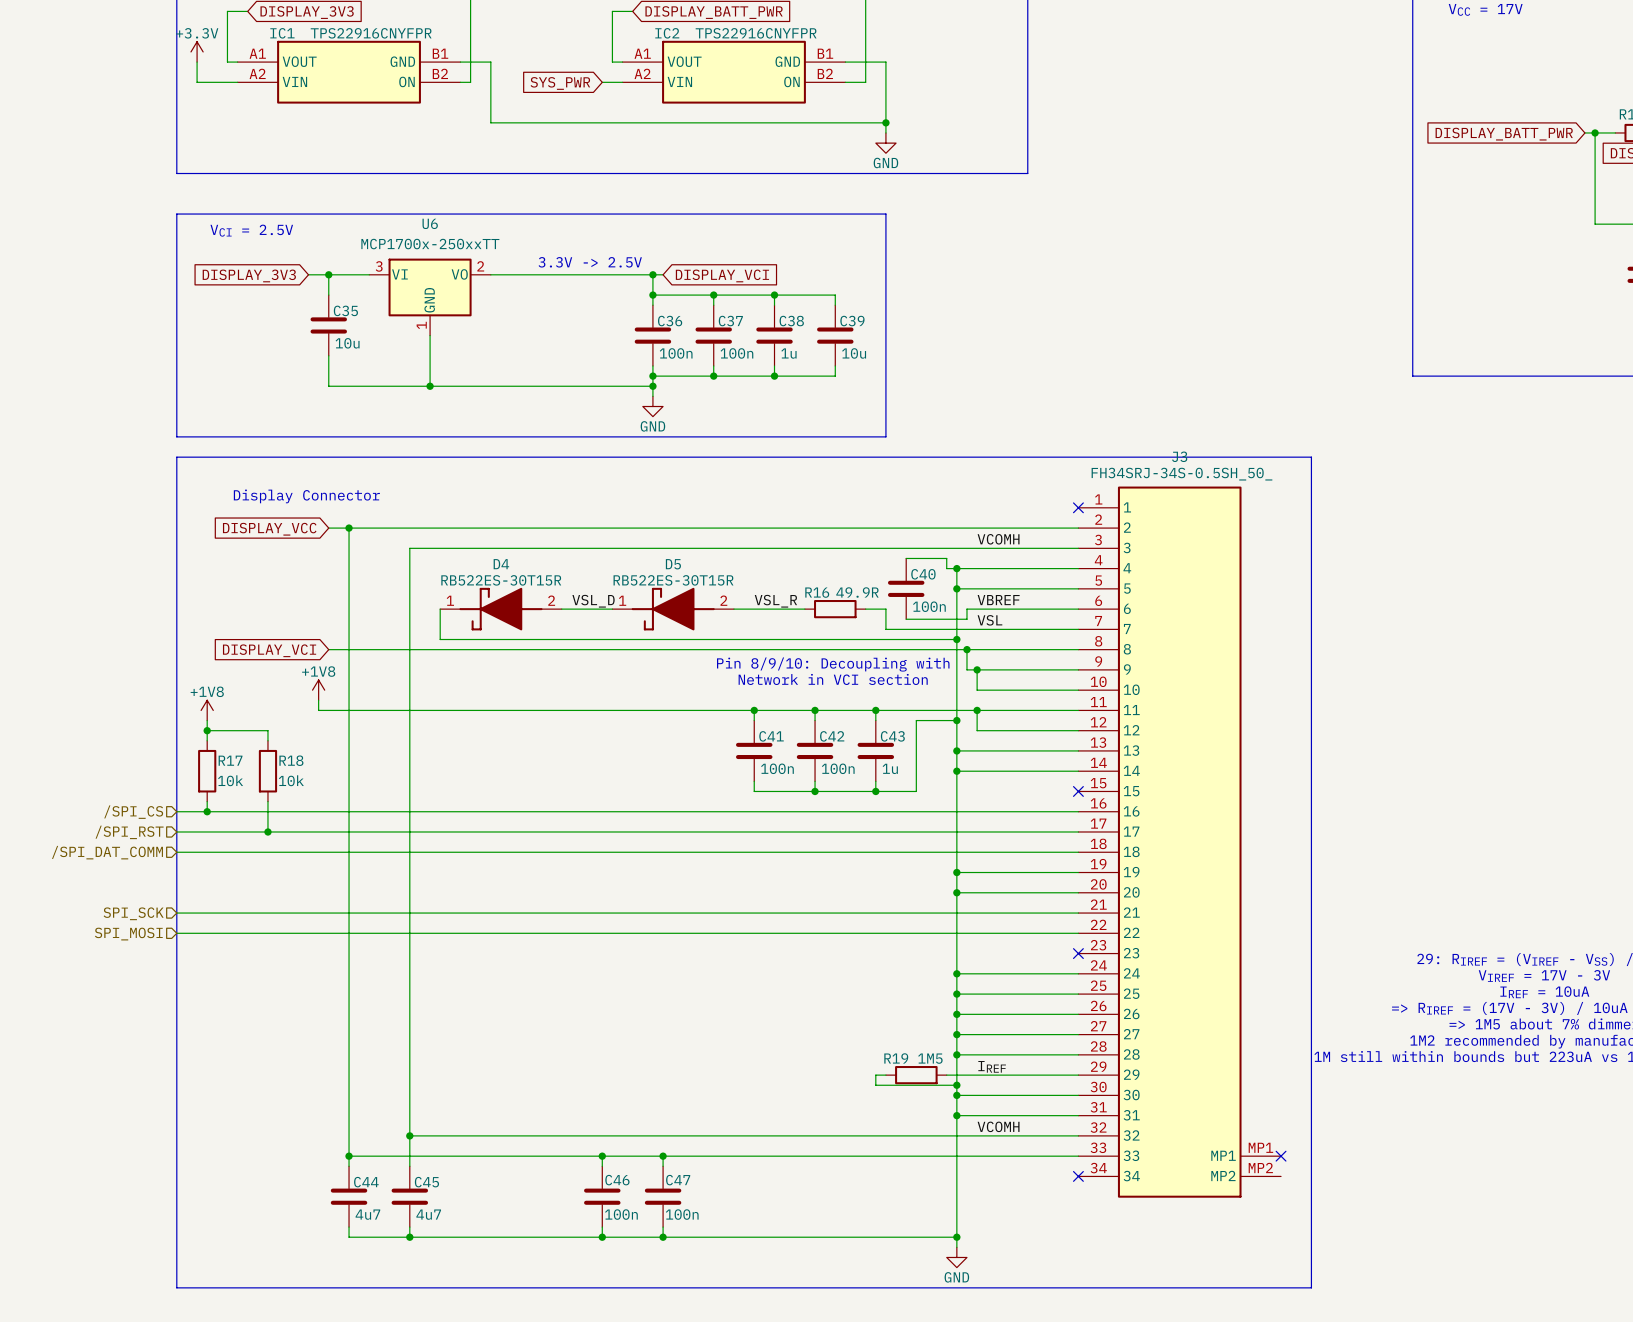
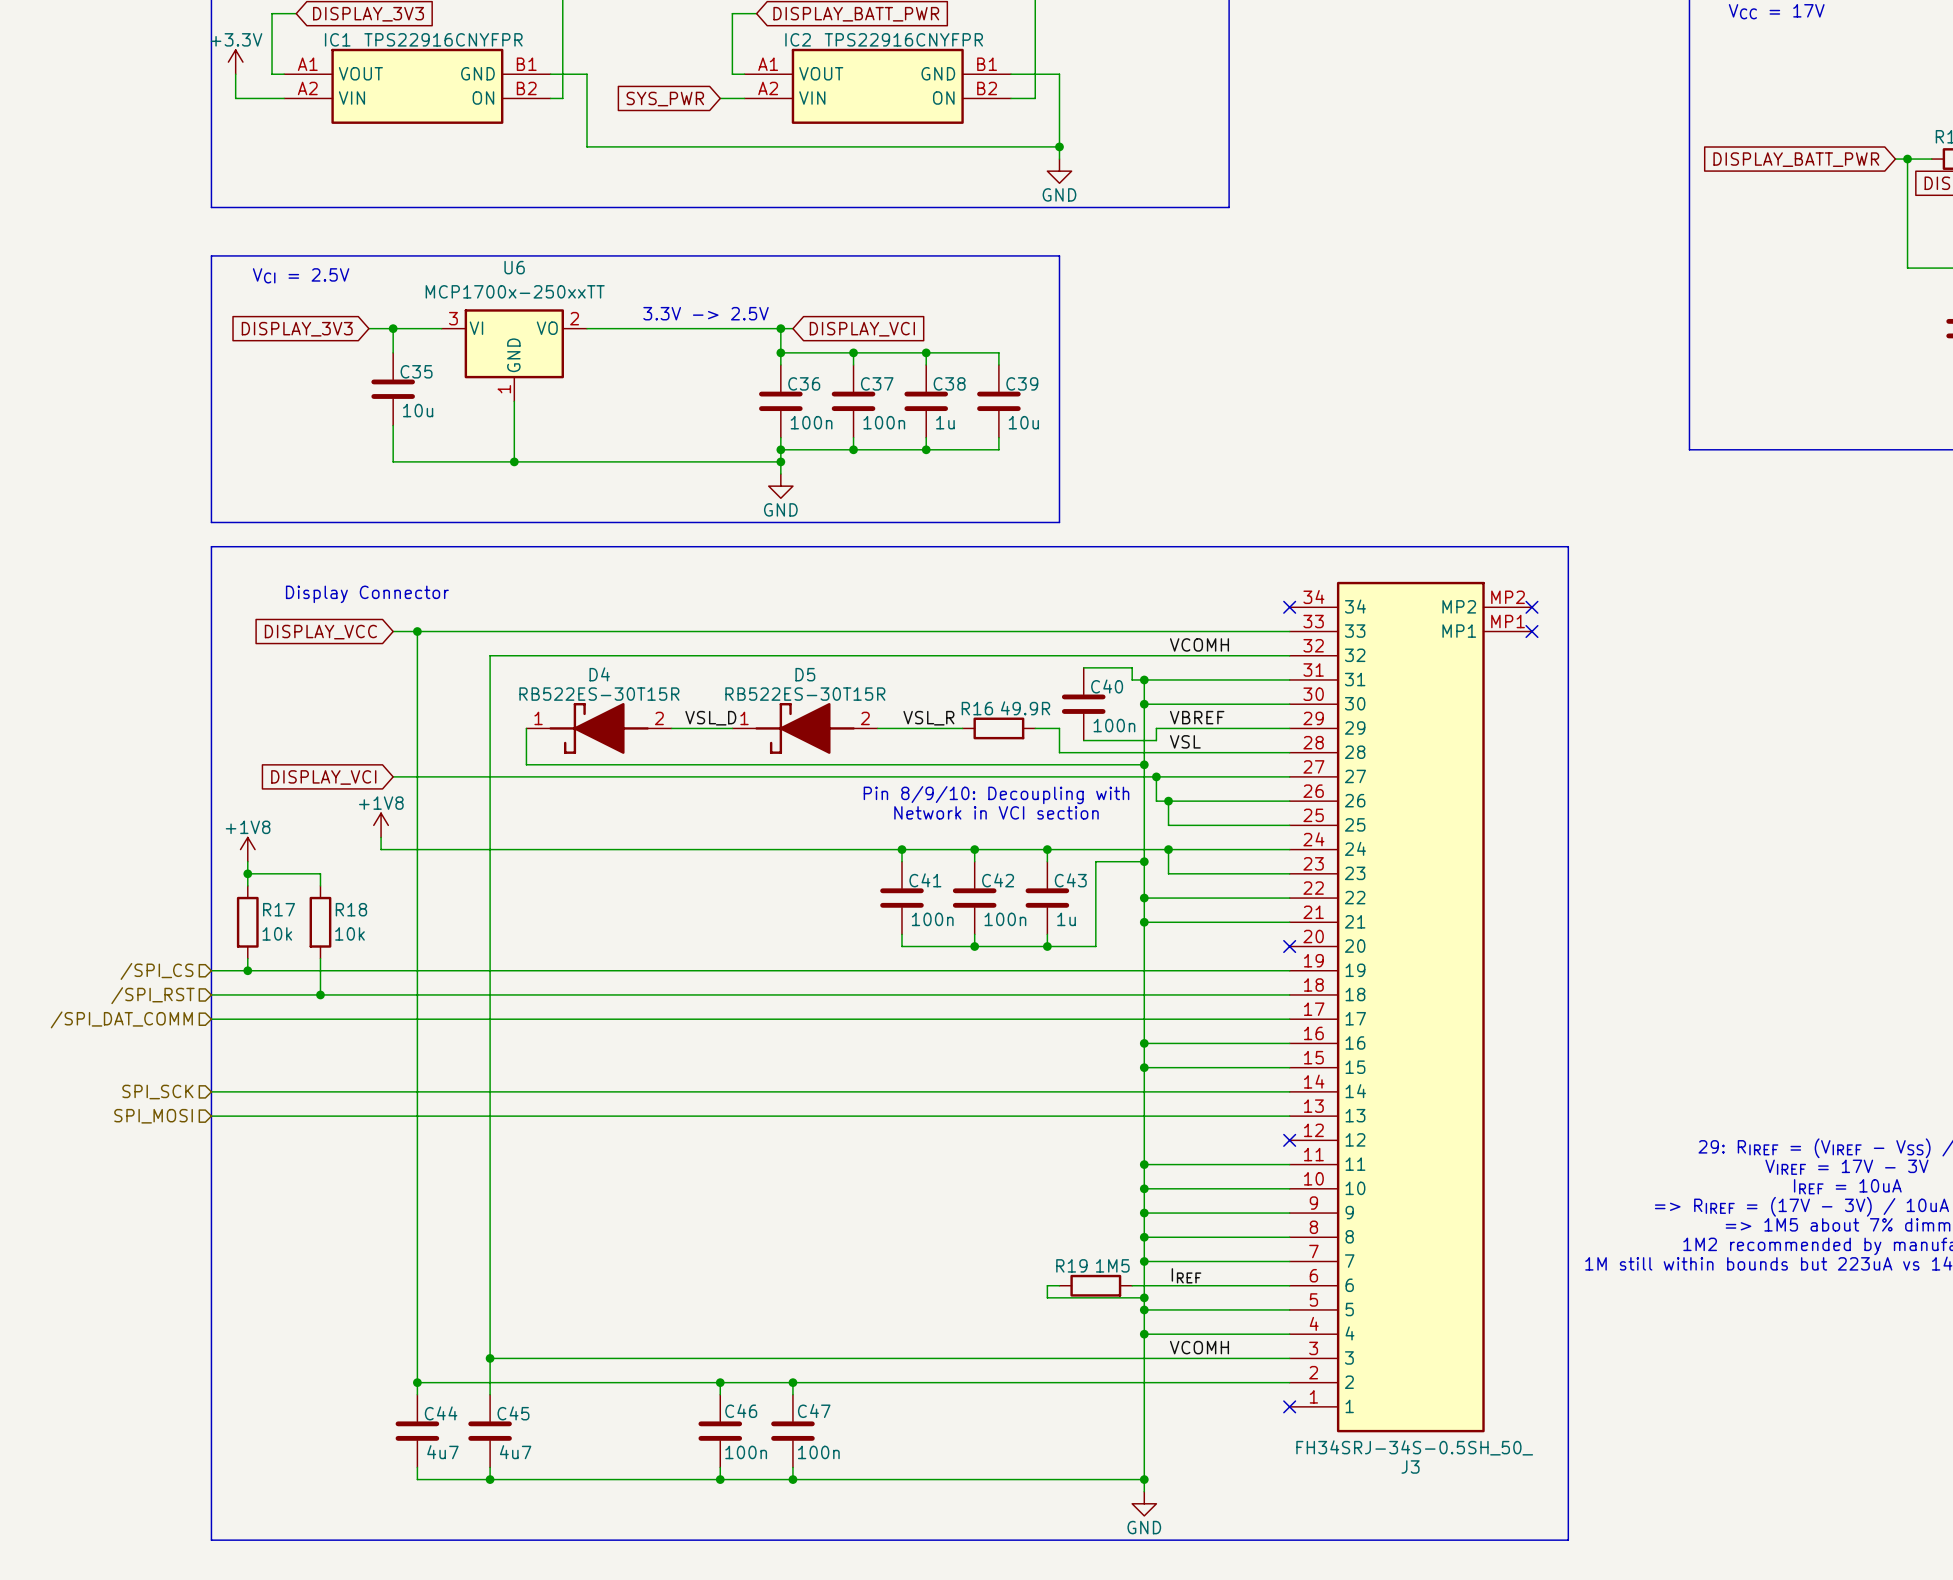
no-connect mark: none -> (1531, 607)
no-connect mark: none -> (1531, 631)
J3 flip: as is (1179, 842) -> up-down (1410, 1007)
no-connect mark: (1281, 1156) -> none

